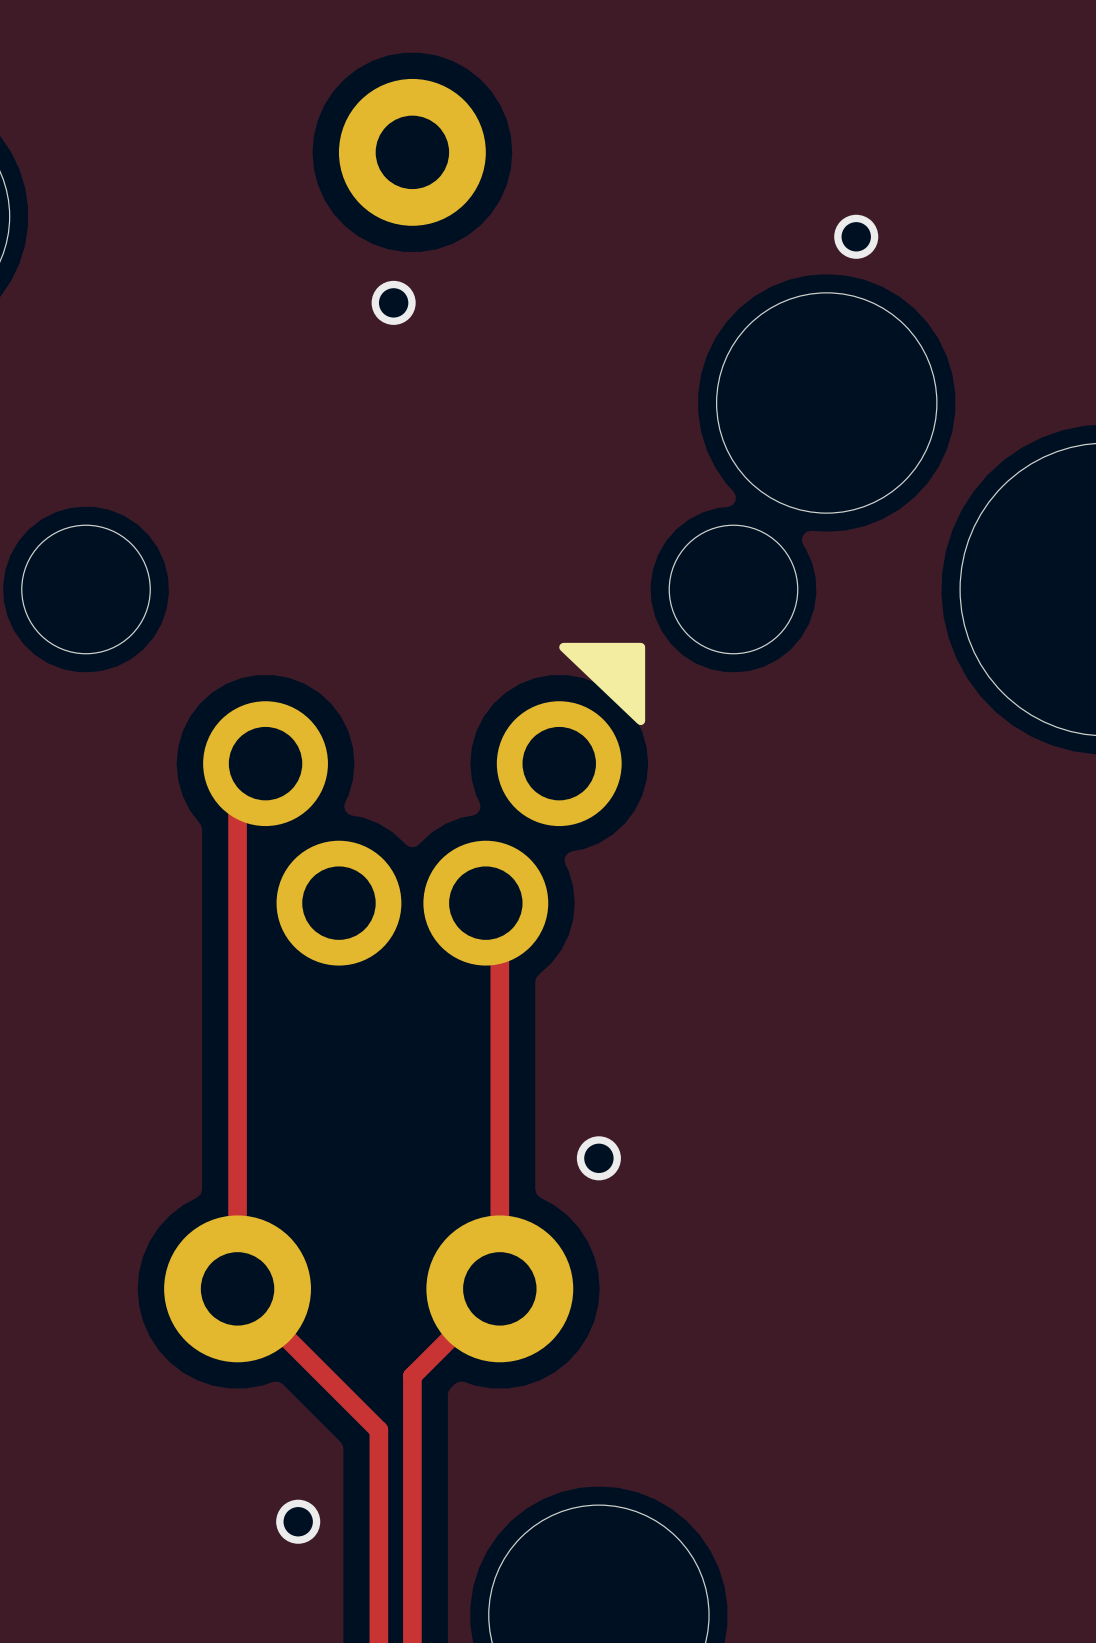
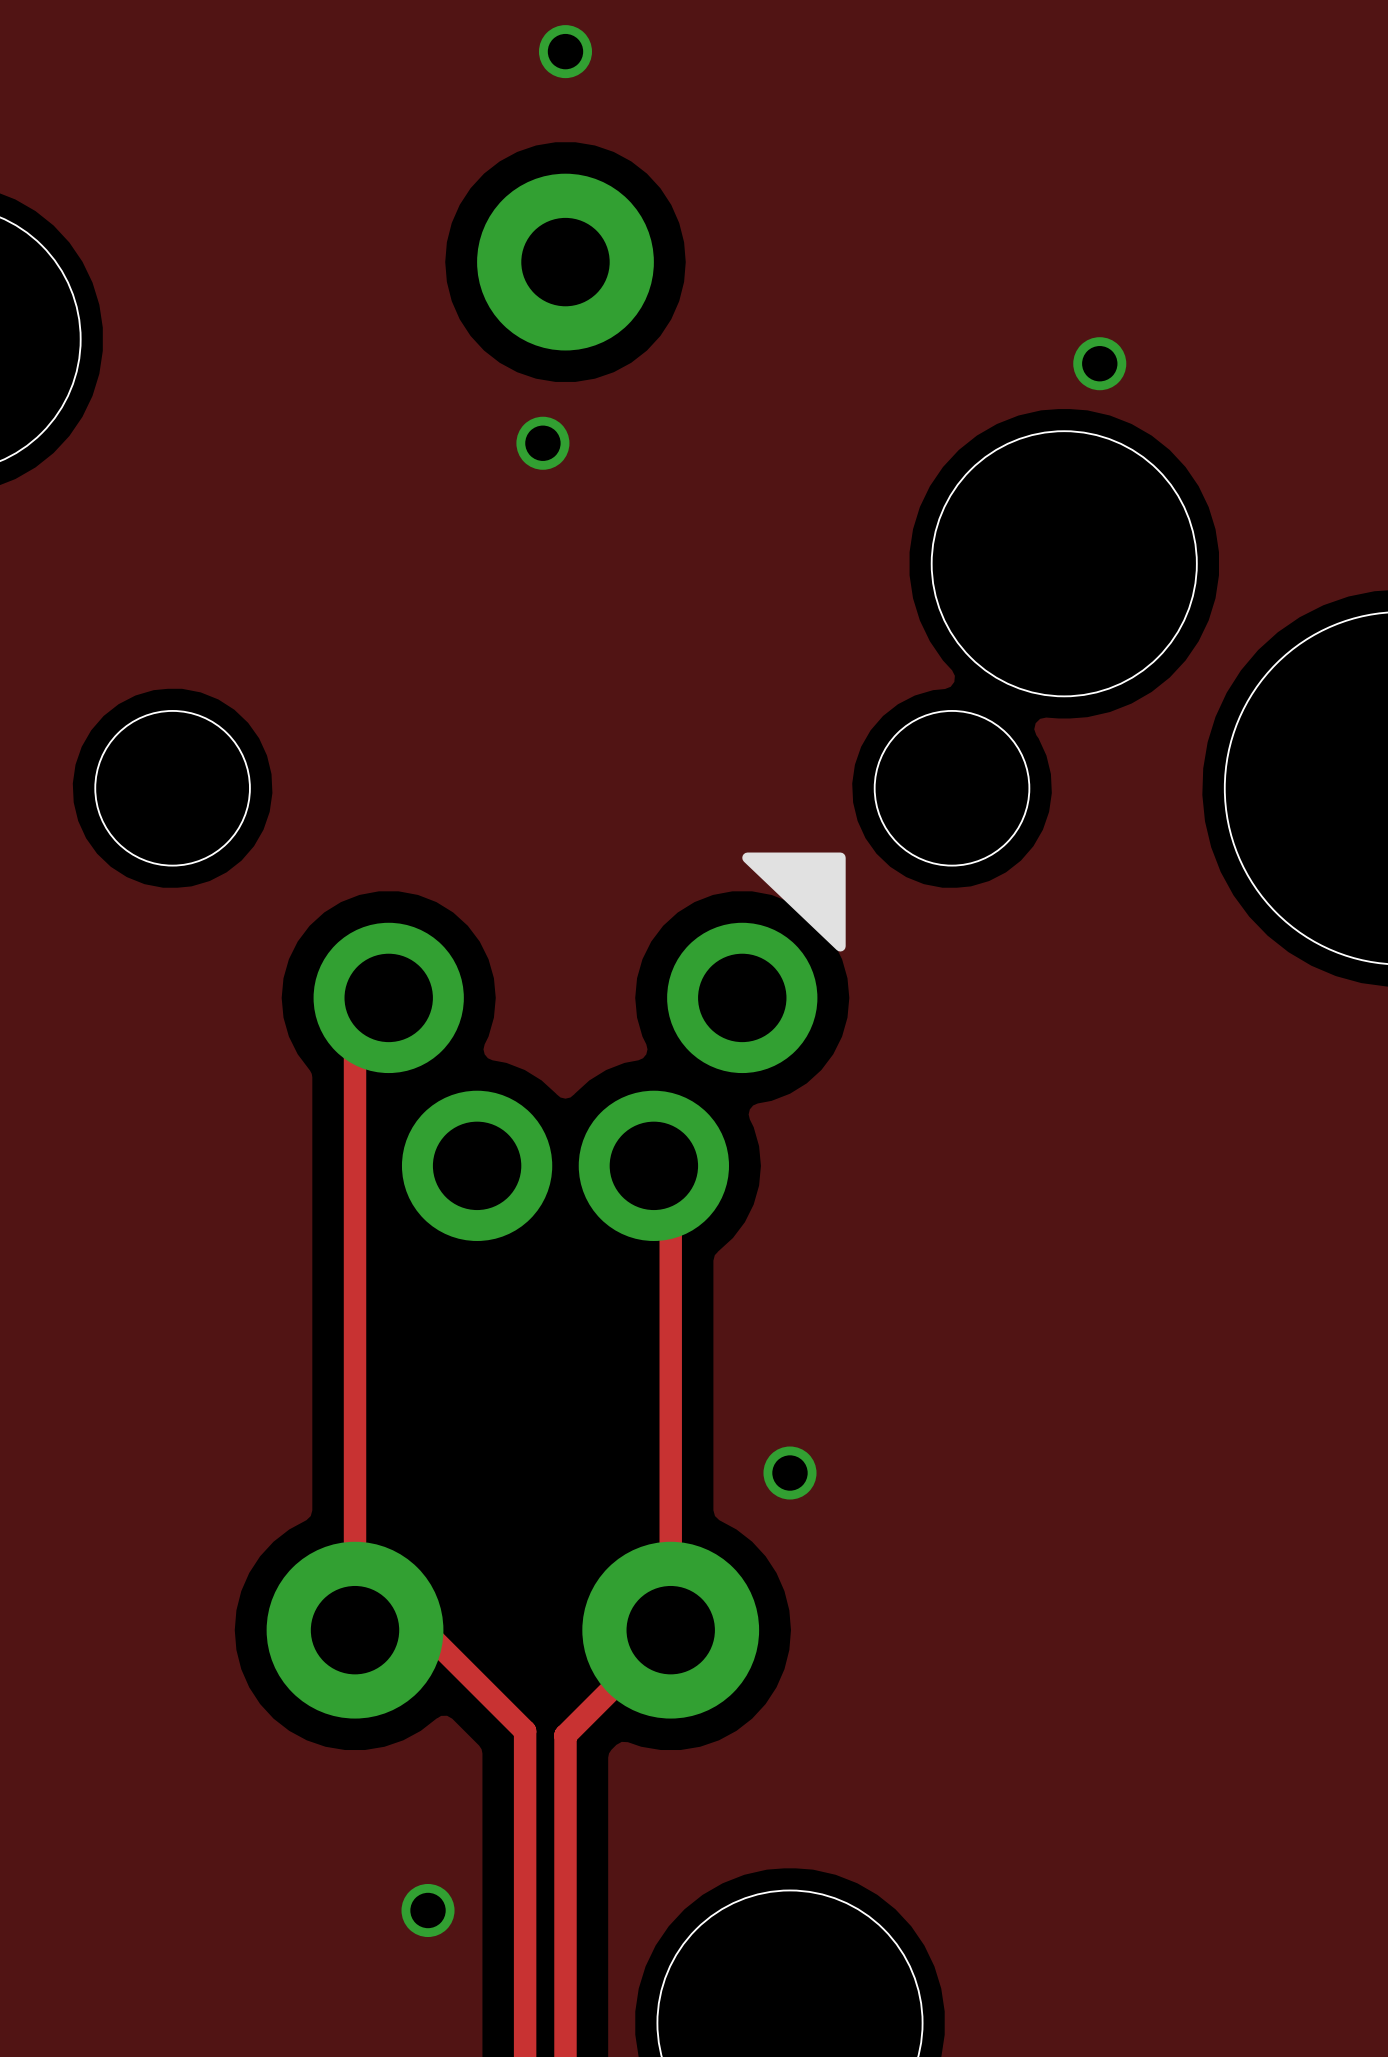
track: (237, 1288) (378, 1430) -> (355, 1630) (424, 1630) (525, 1731) (525, 1800)

